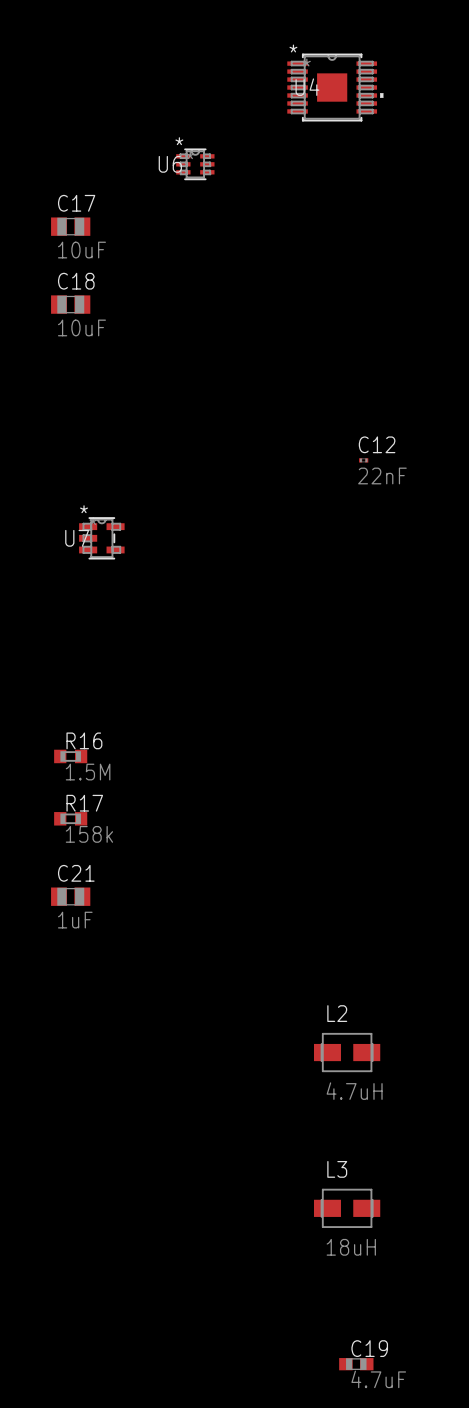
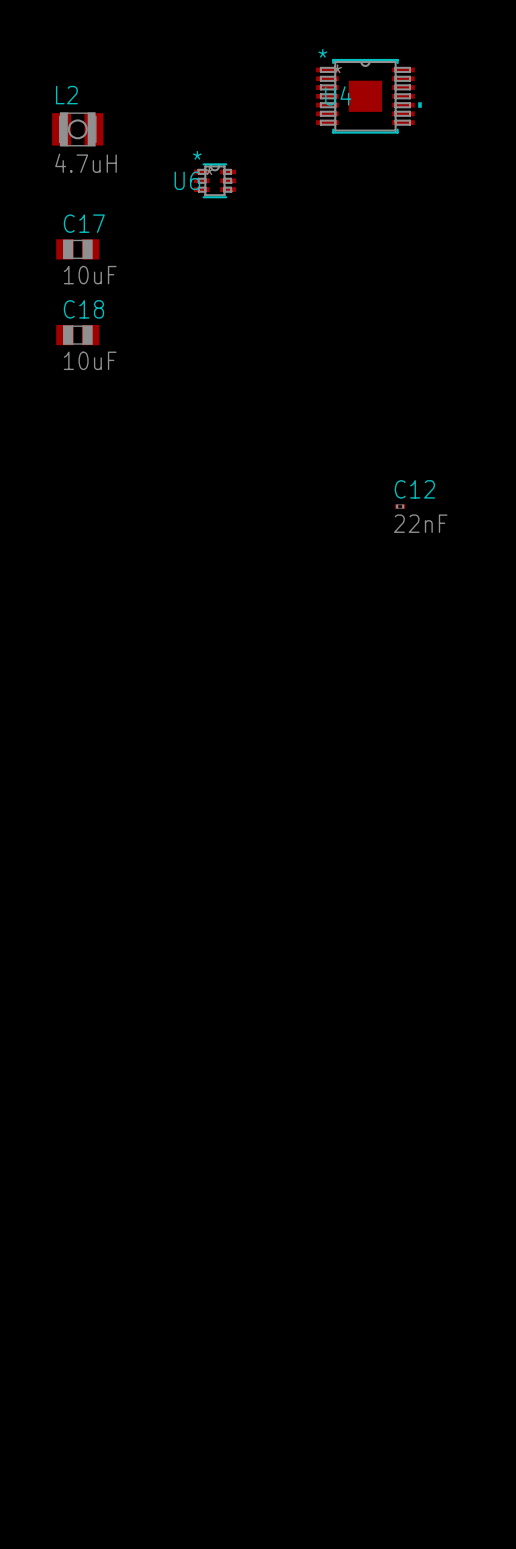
U7: (101, 538) -> none
R16: 1.5M (70, 756) -> none
R17: 158k (70, 818) -> none
C21: 1uF (70, 896) -> none
L2 footprint: [313, 1032, 381, 1073] -> [52, 112, 104, 147]
L3: 18uH (347, 1208) -> none
C19: 4.7uF (356, 1364) -> none

